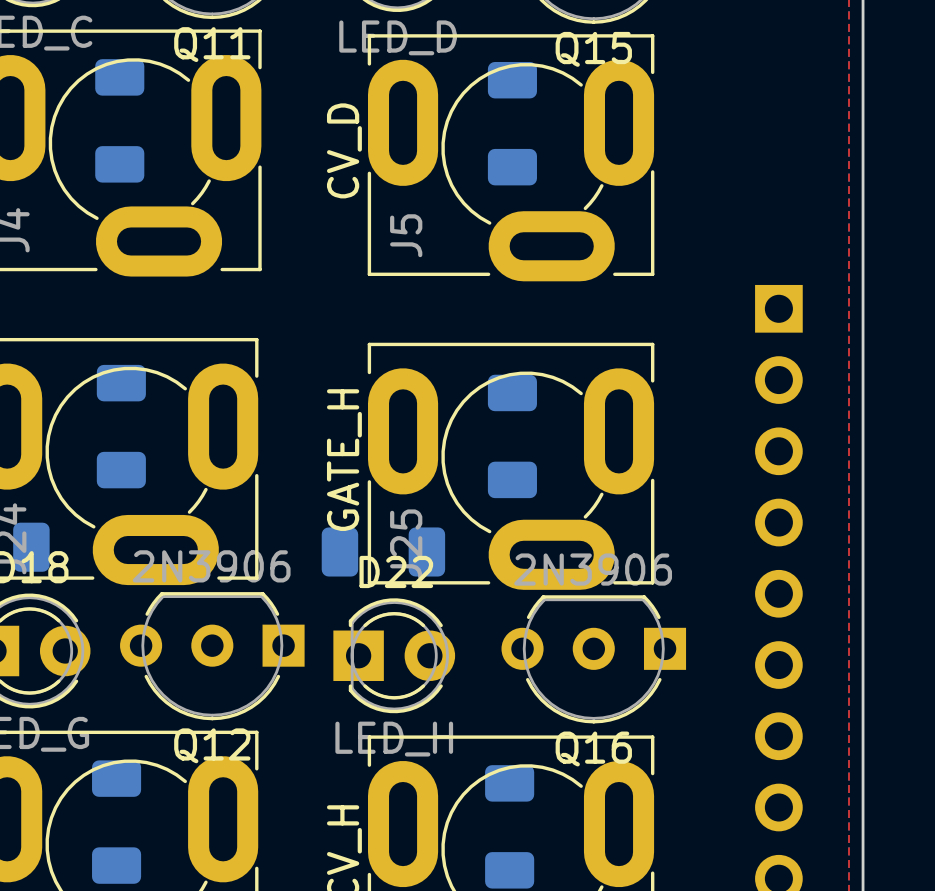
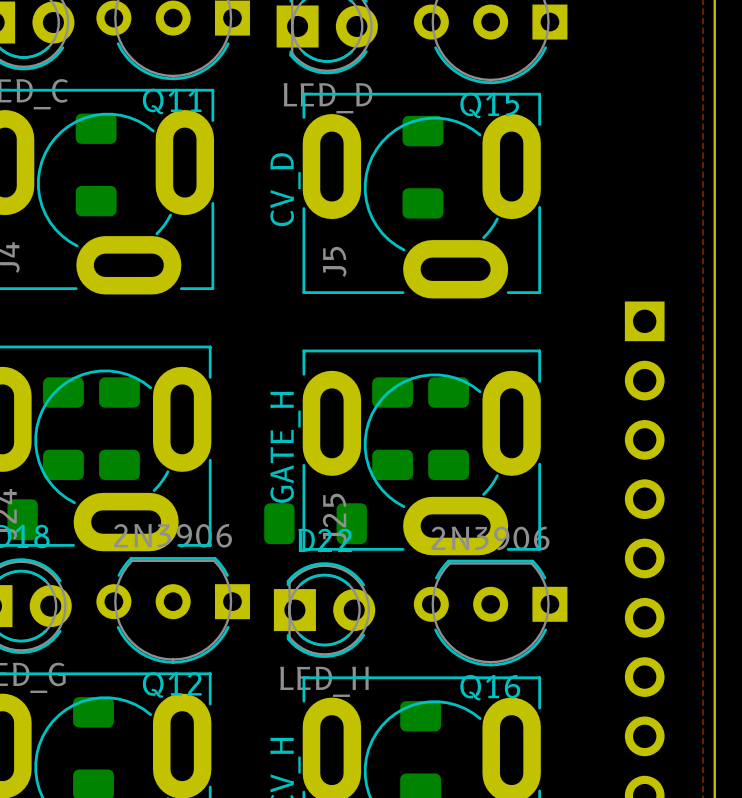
part: (121, 426) -> none
part: (512, 436) -> none
part: none -> (63, 428)
part: none -> (119, 428)
part: none -> (392, 428)
part: none -> (448, 428)

